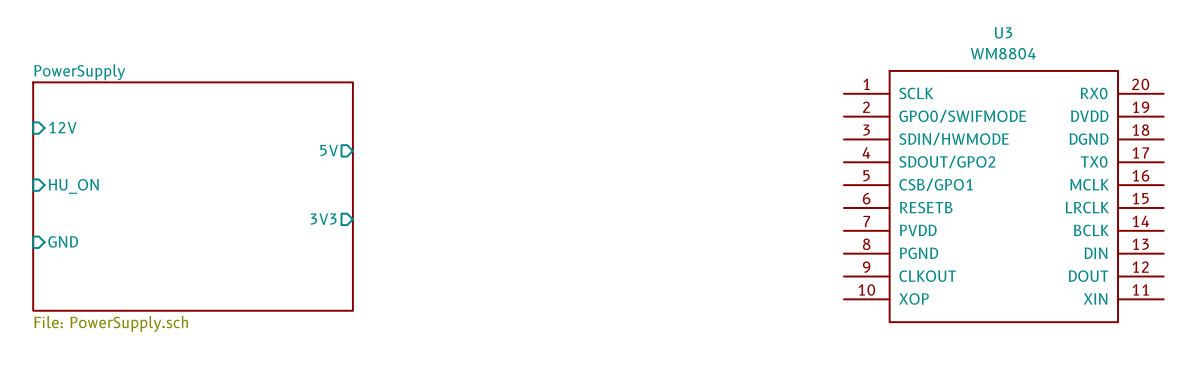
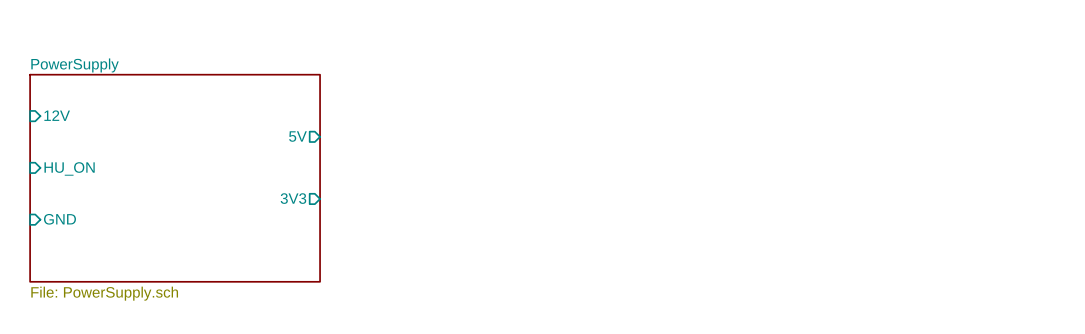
U3: WM8804 (1003, 196) -> none

